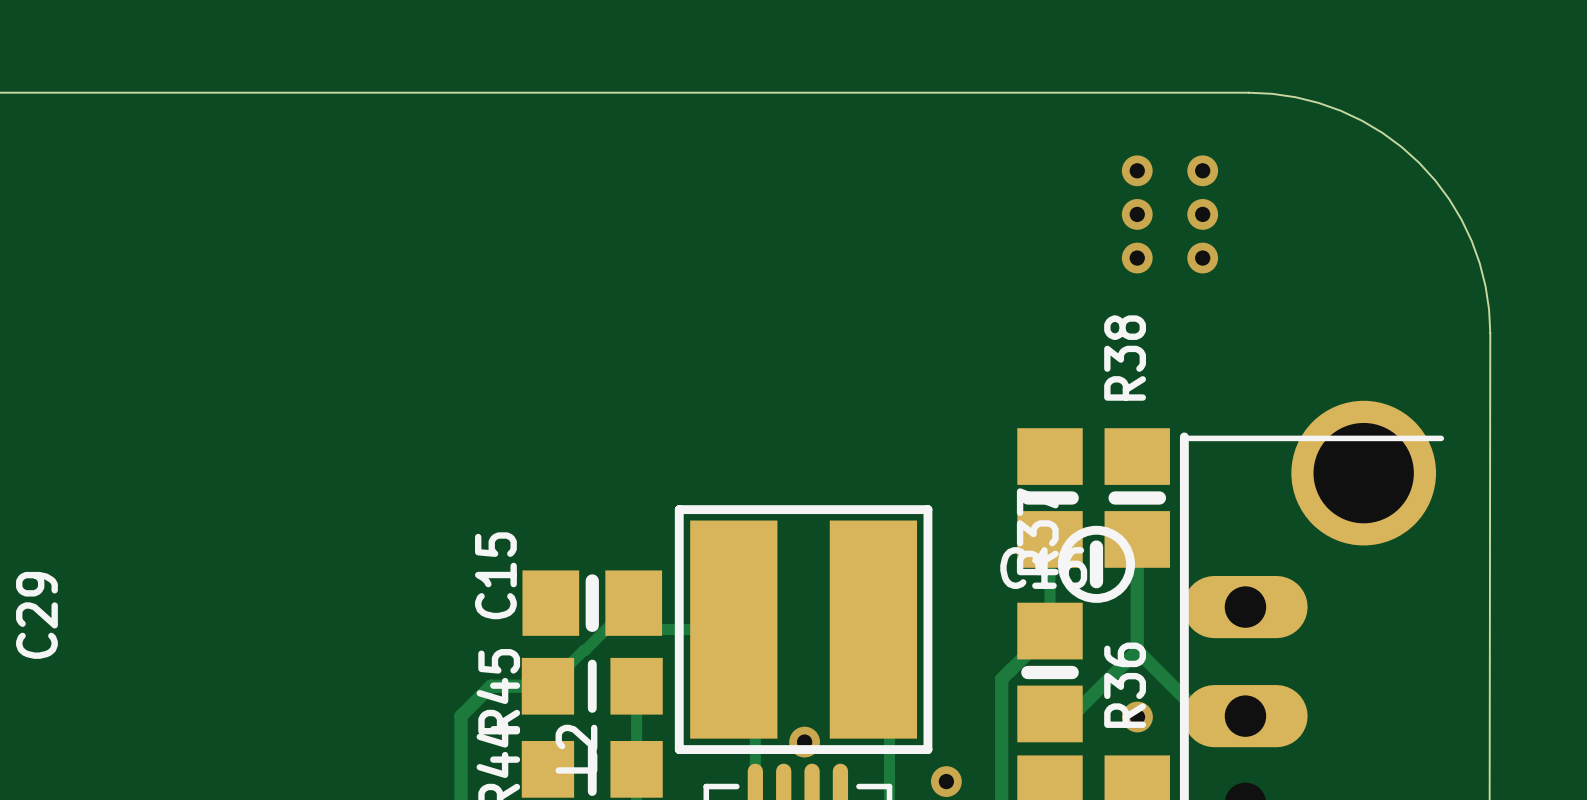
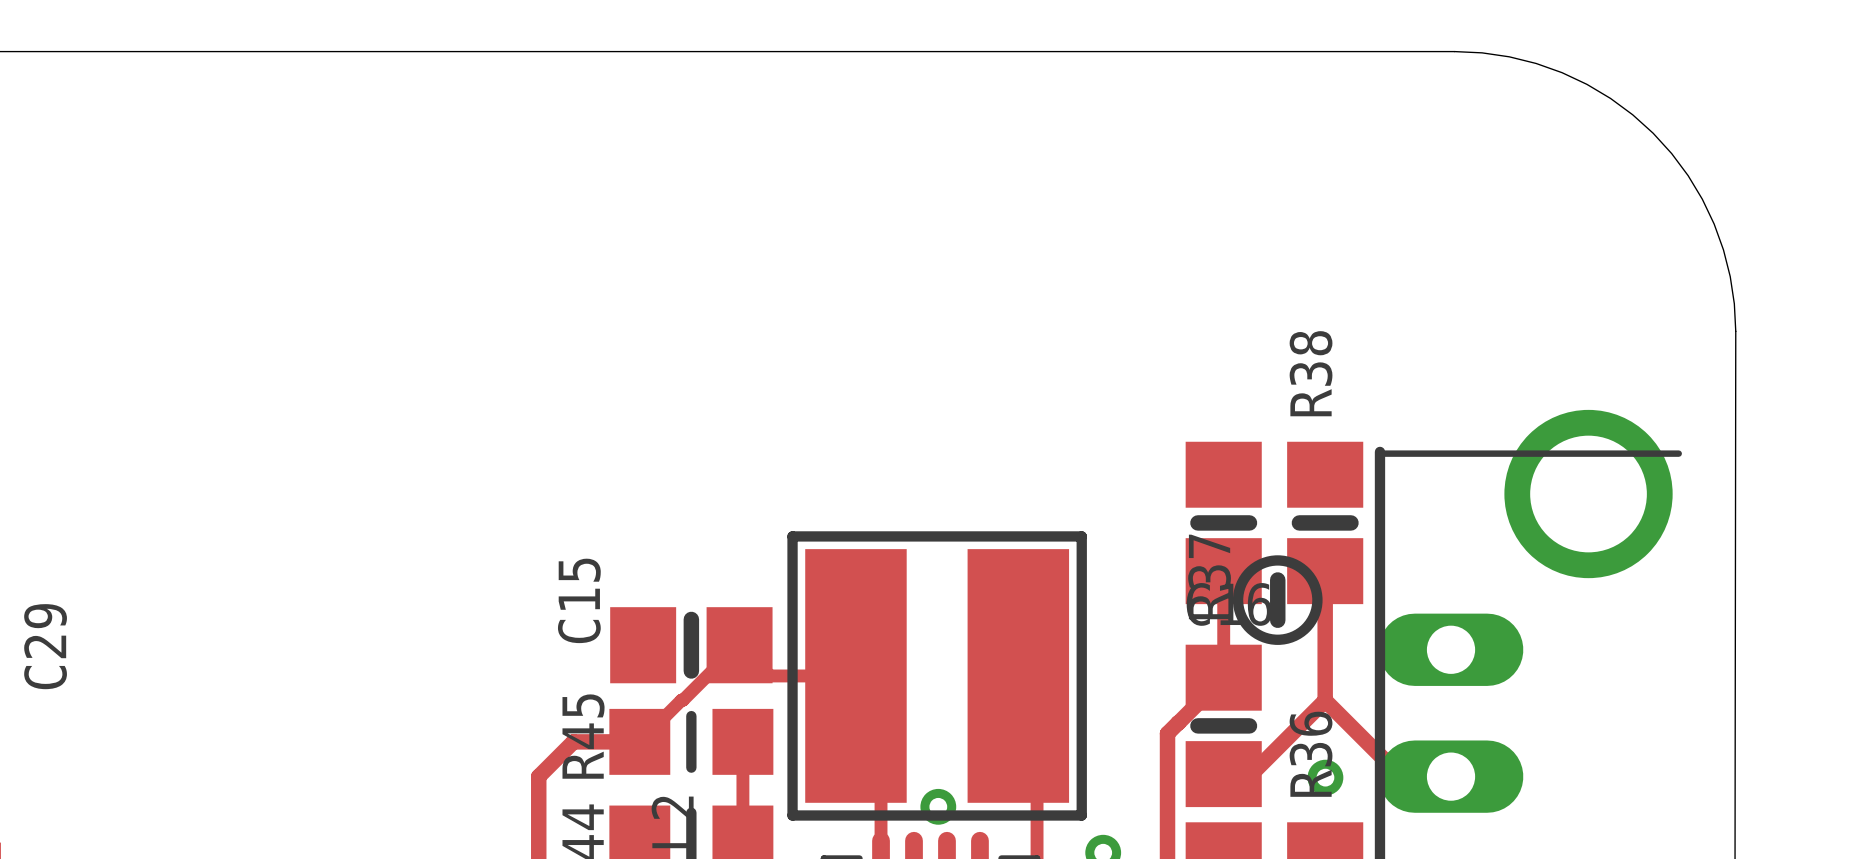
via: (1137, 170) -> none
via: (1202, 170) -> none
via: (1137, 214) -> none
via: (1202, 214) -> none
via: (1137, 258) -> none
via: (1202, 258) -> none

